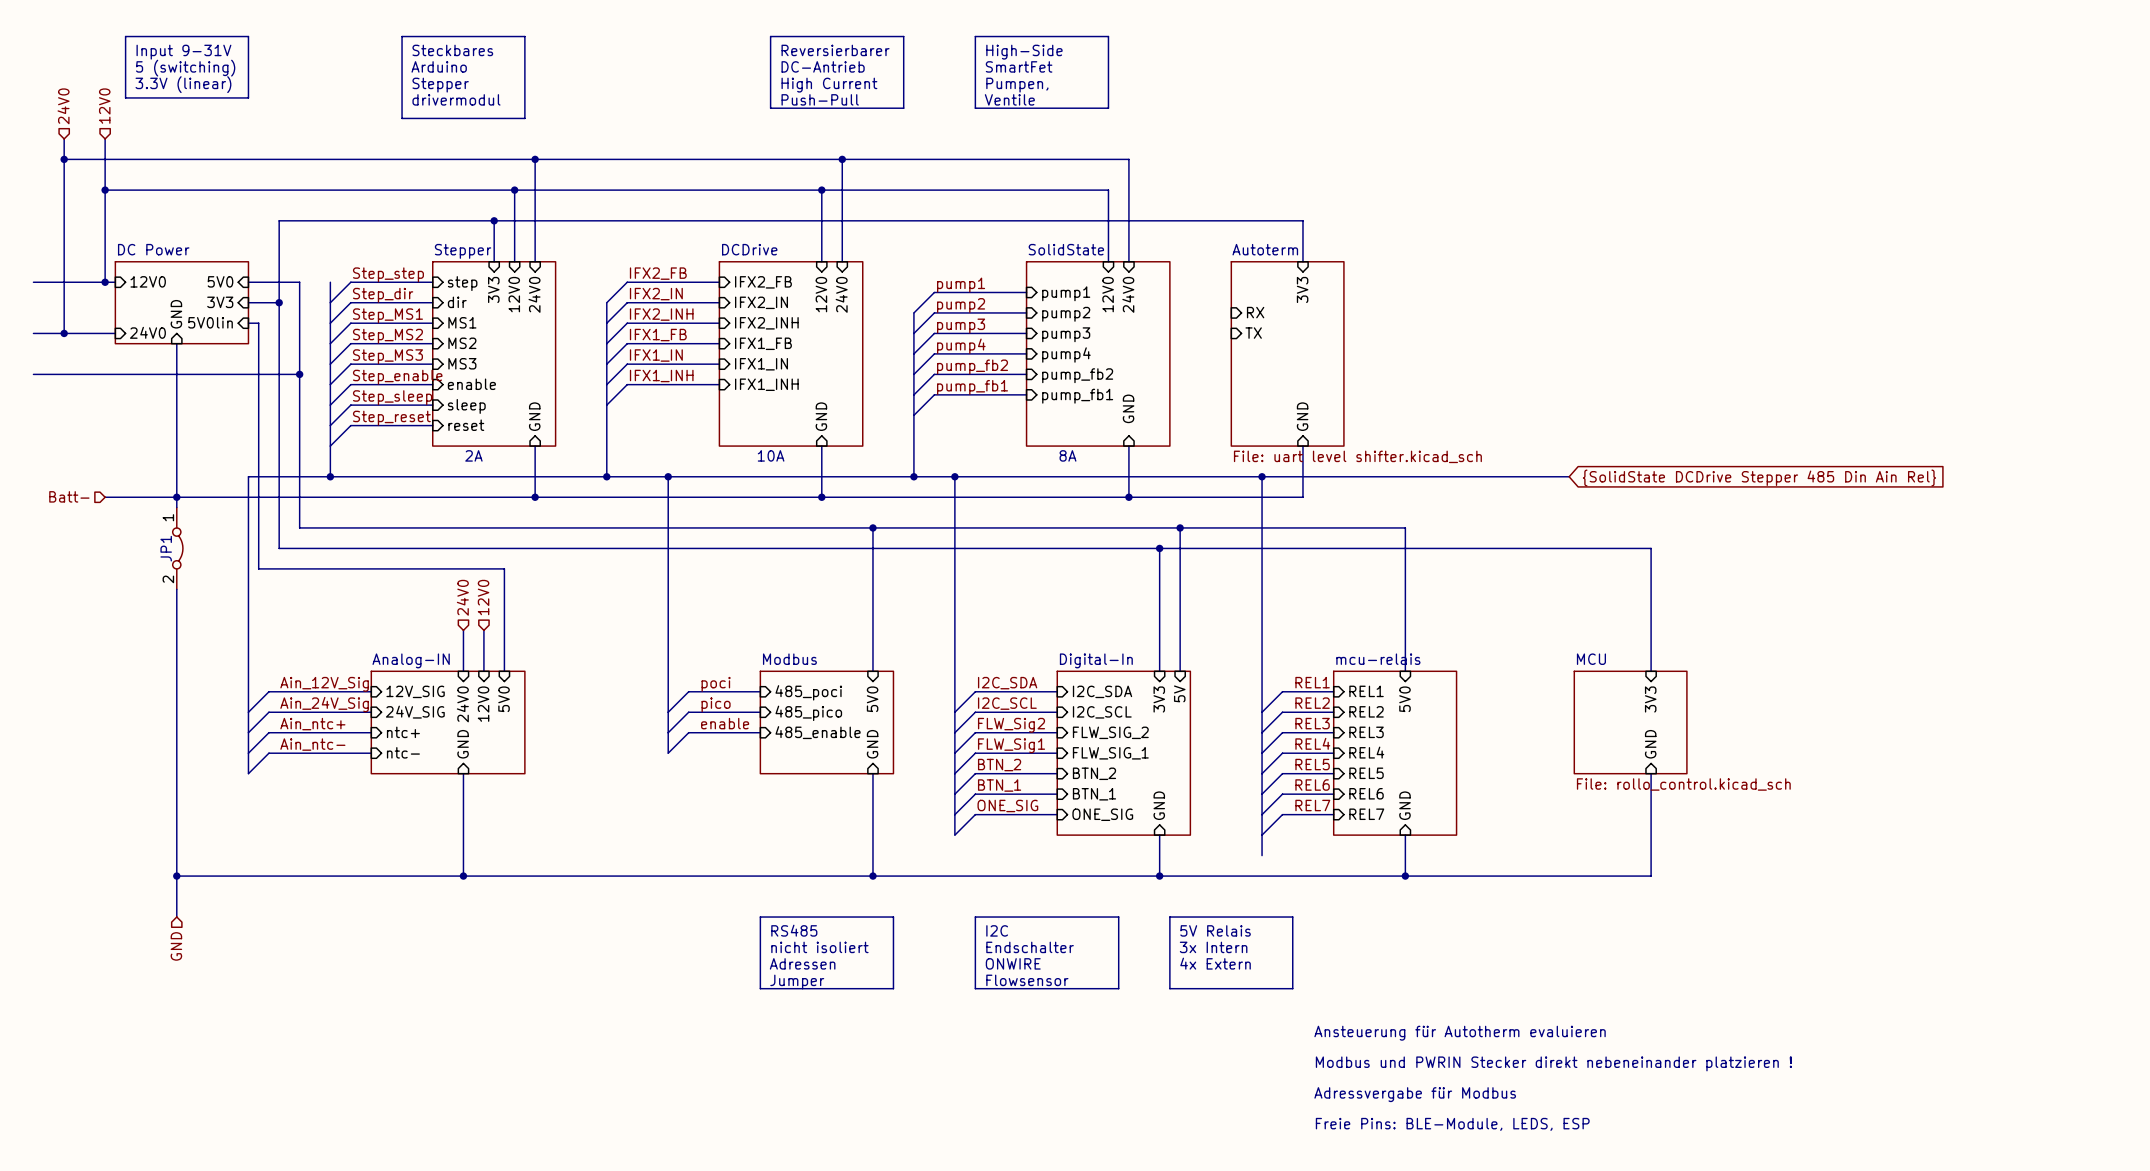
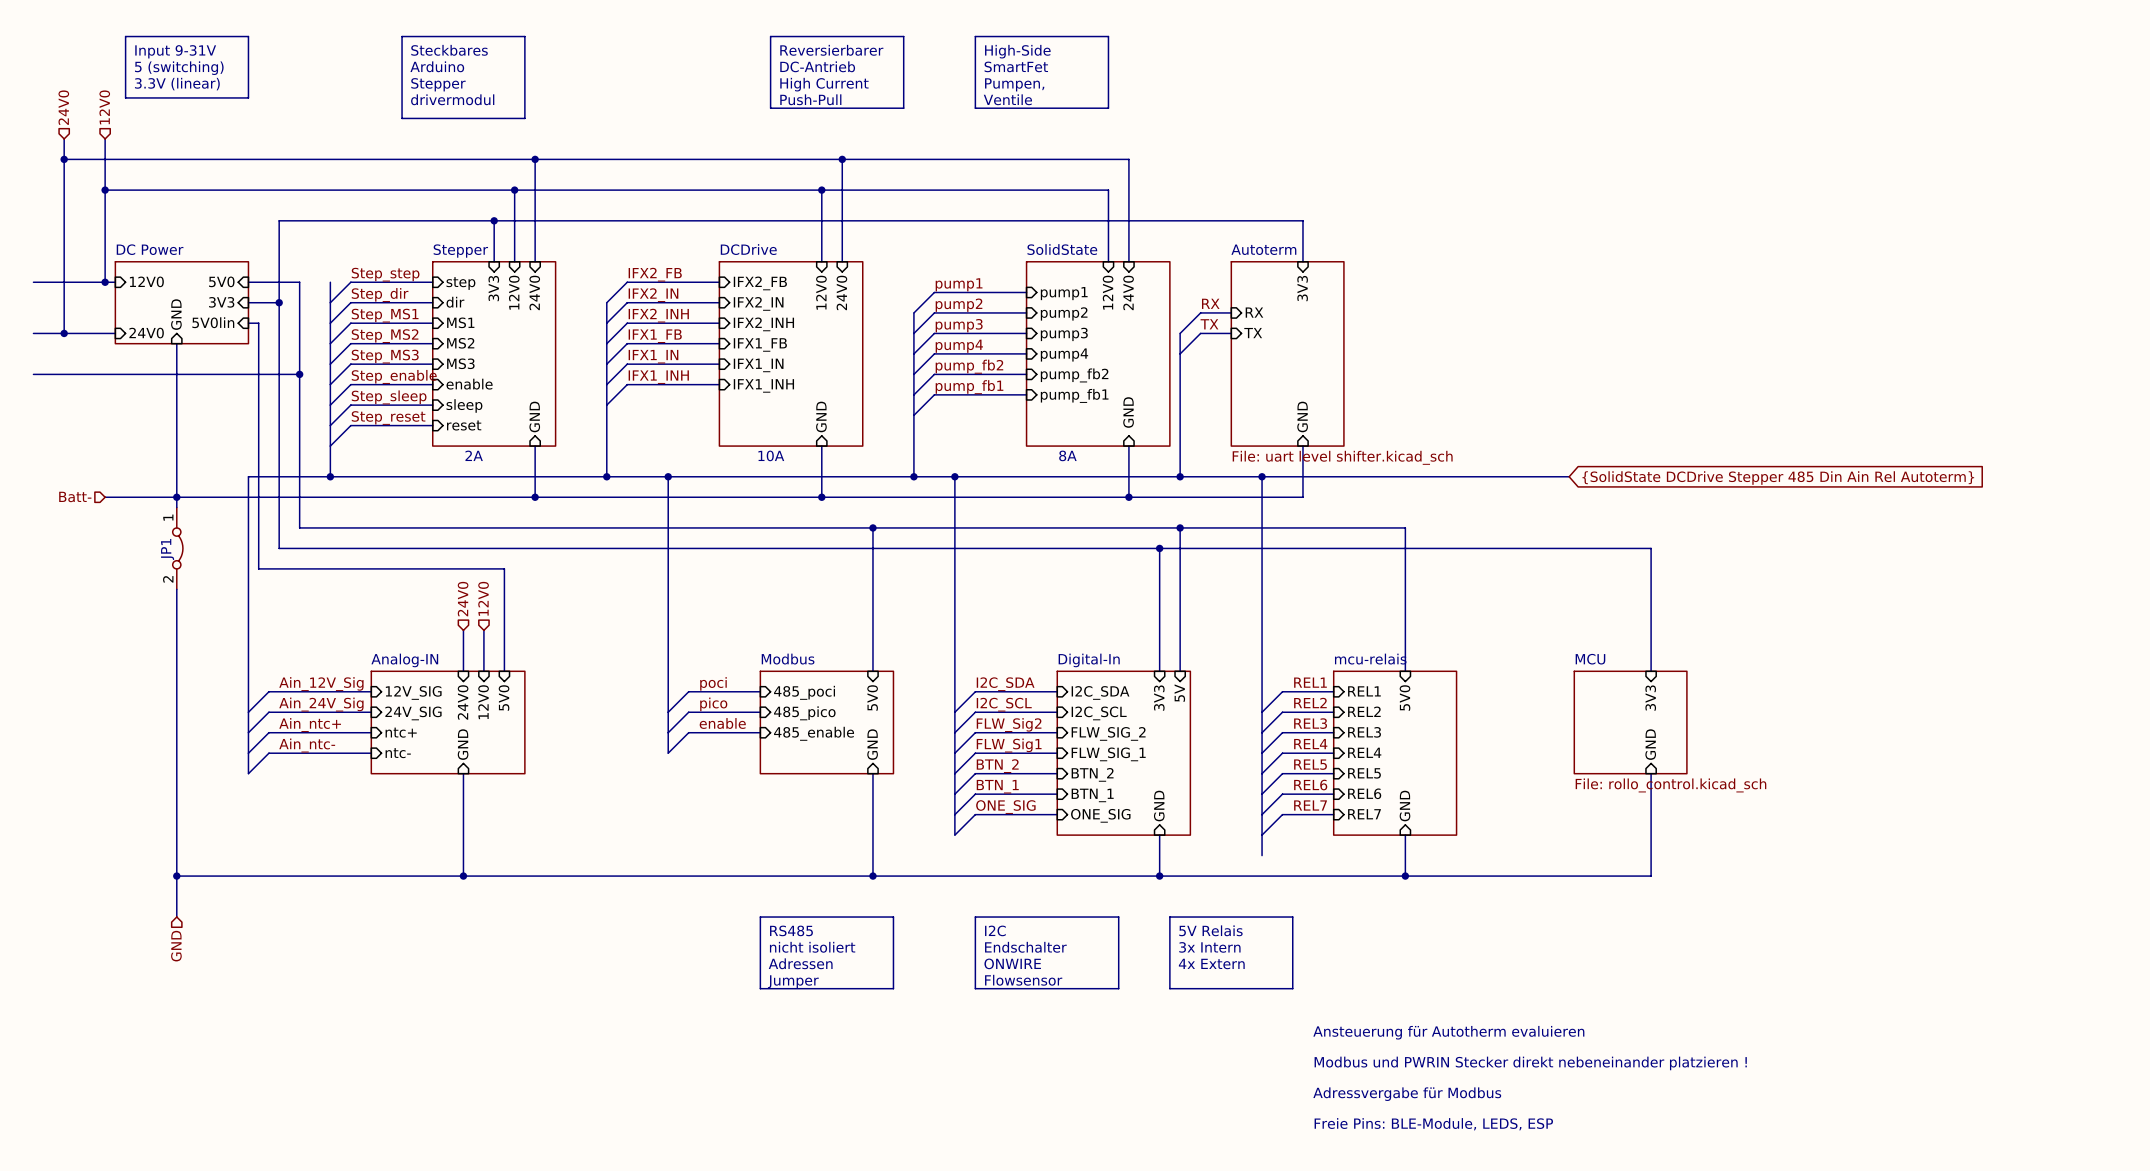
label: none -> RX (1210, 303)
wire: none -> (1231, 312) (1200, 312) (1180, 333)
label: none -> TX (1209, 324)
bus: none -> (1180, 333) (1180, 476)
wire: none -> (1231, 333) (1200, 333) (1180, 353)
junction: none -> (1180, 476)
global label: {SolidState DCDrive Stepper 485 Din Ain Rel} (1759, 477) -> {SolidState DCDrive Stepper 485 Din Ain Rel Autoterm} (1778, 478)

